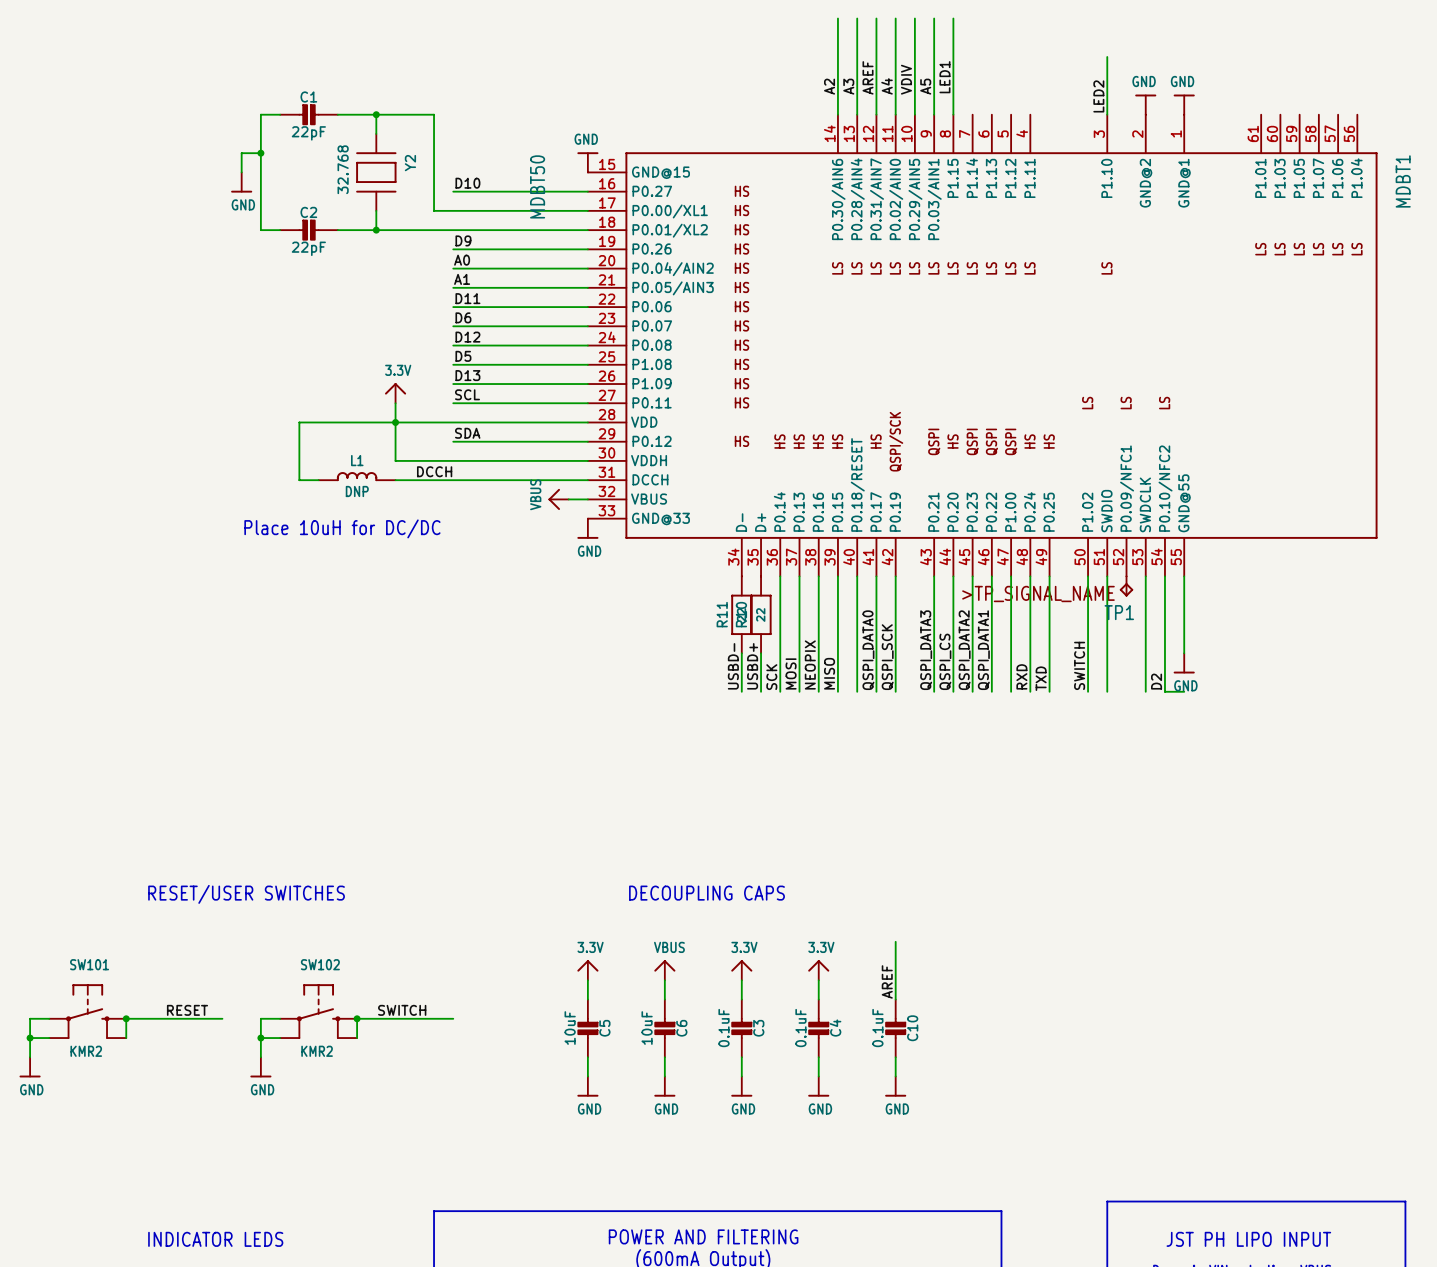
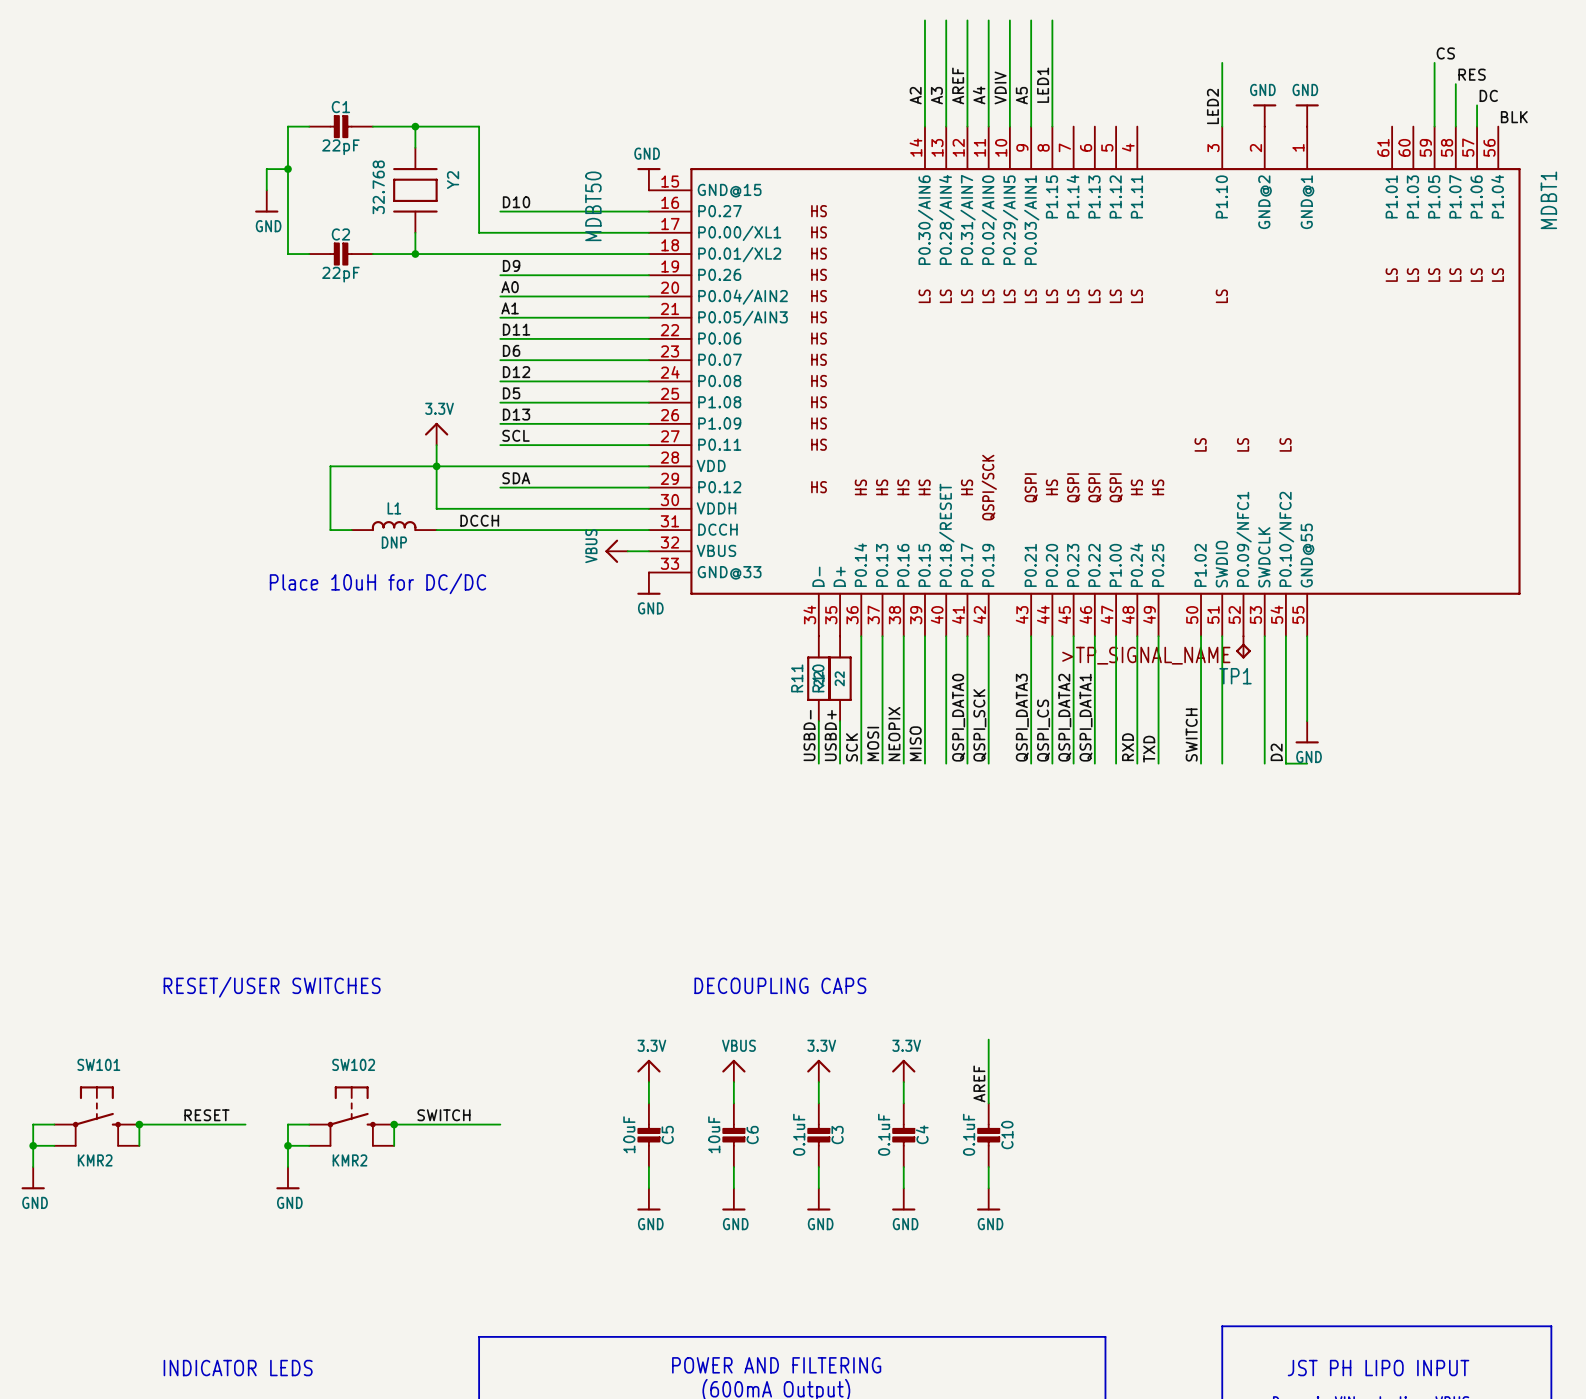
label: none -> CS (1445, 53)
wire: none -> (1434, 62) (1434, 126)
label: none -> RES (1472, 74)
wire: none -> (1455, 84) (1455, 126)
label: none -> DC (1488, 95)
wire: none -> (1477, 105) (1477, 126)
label: none -> BLK (1514, 117)

